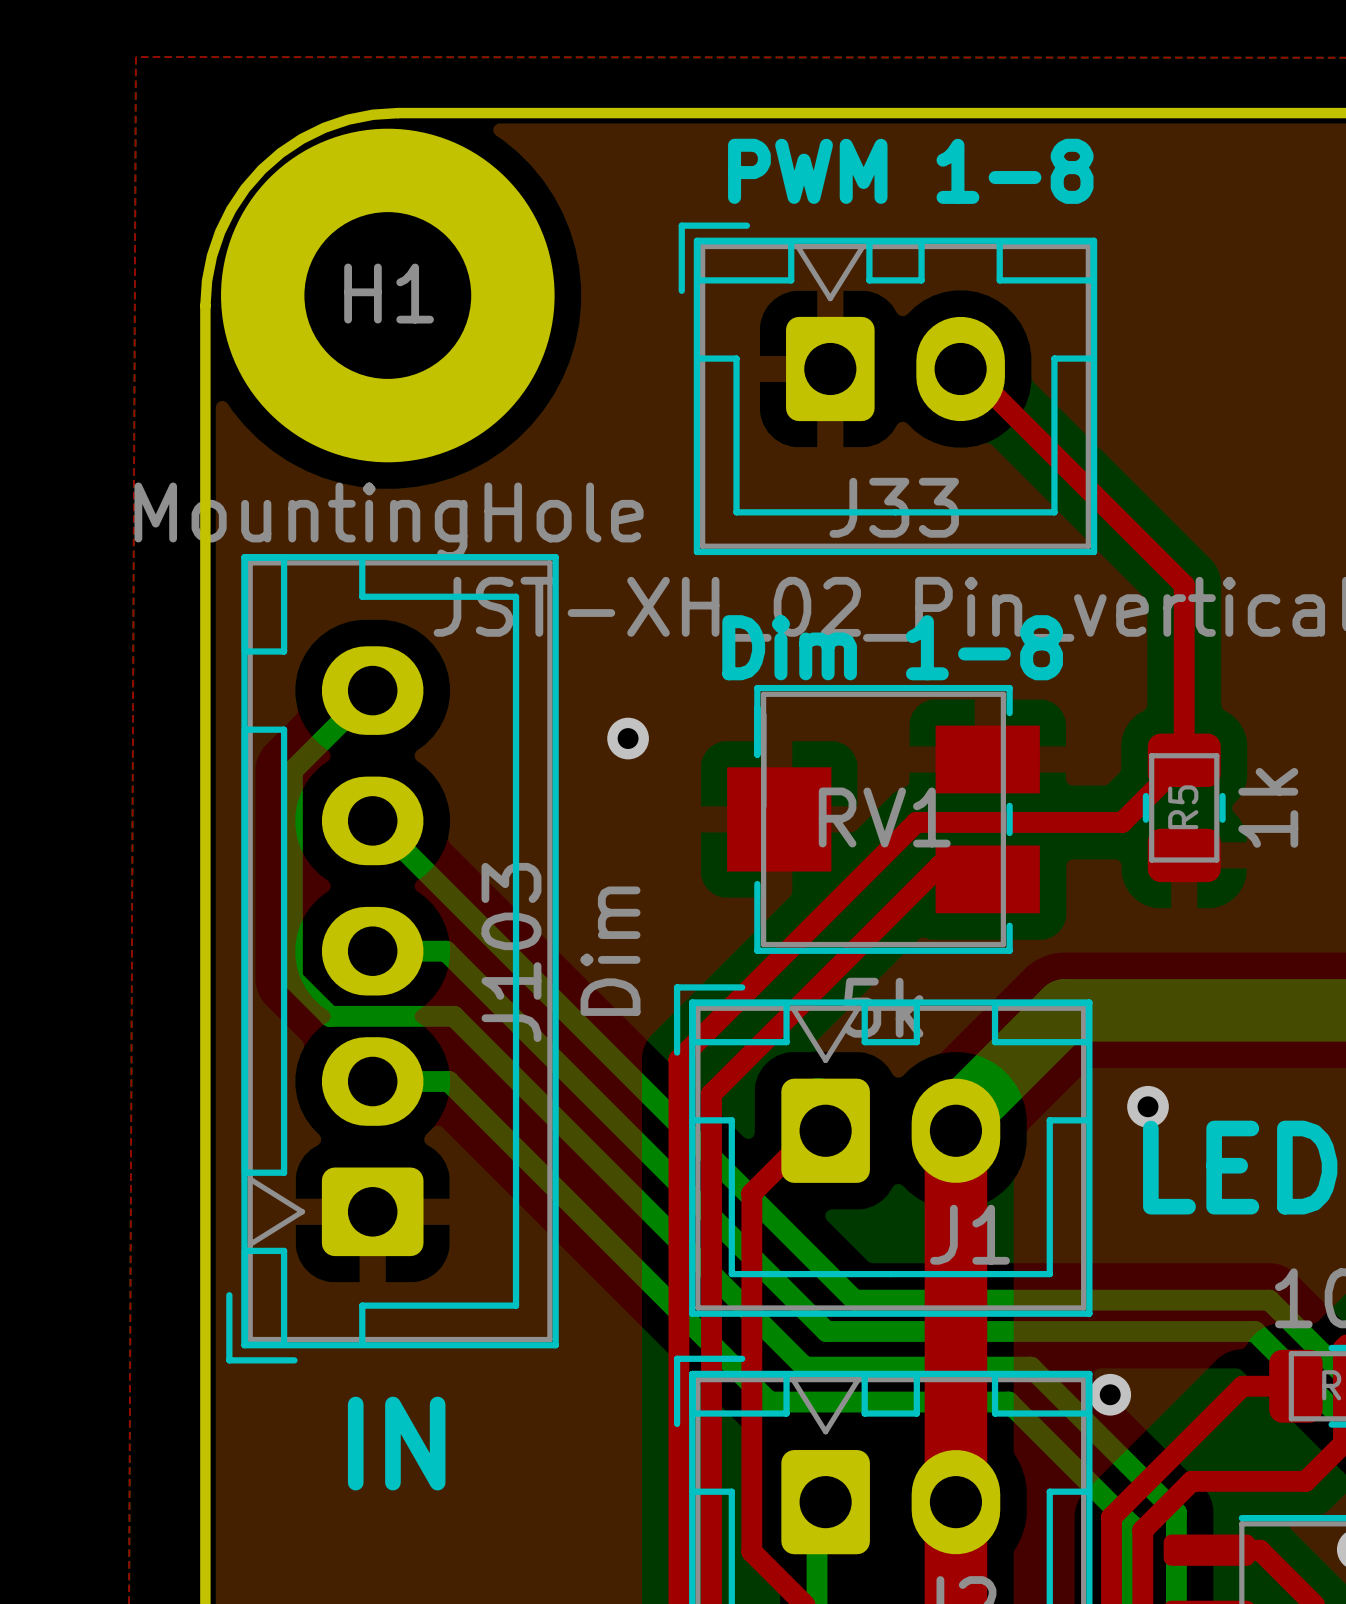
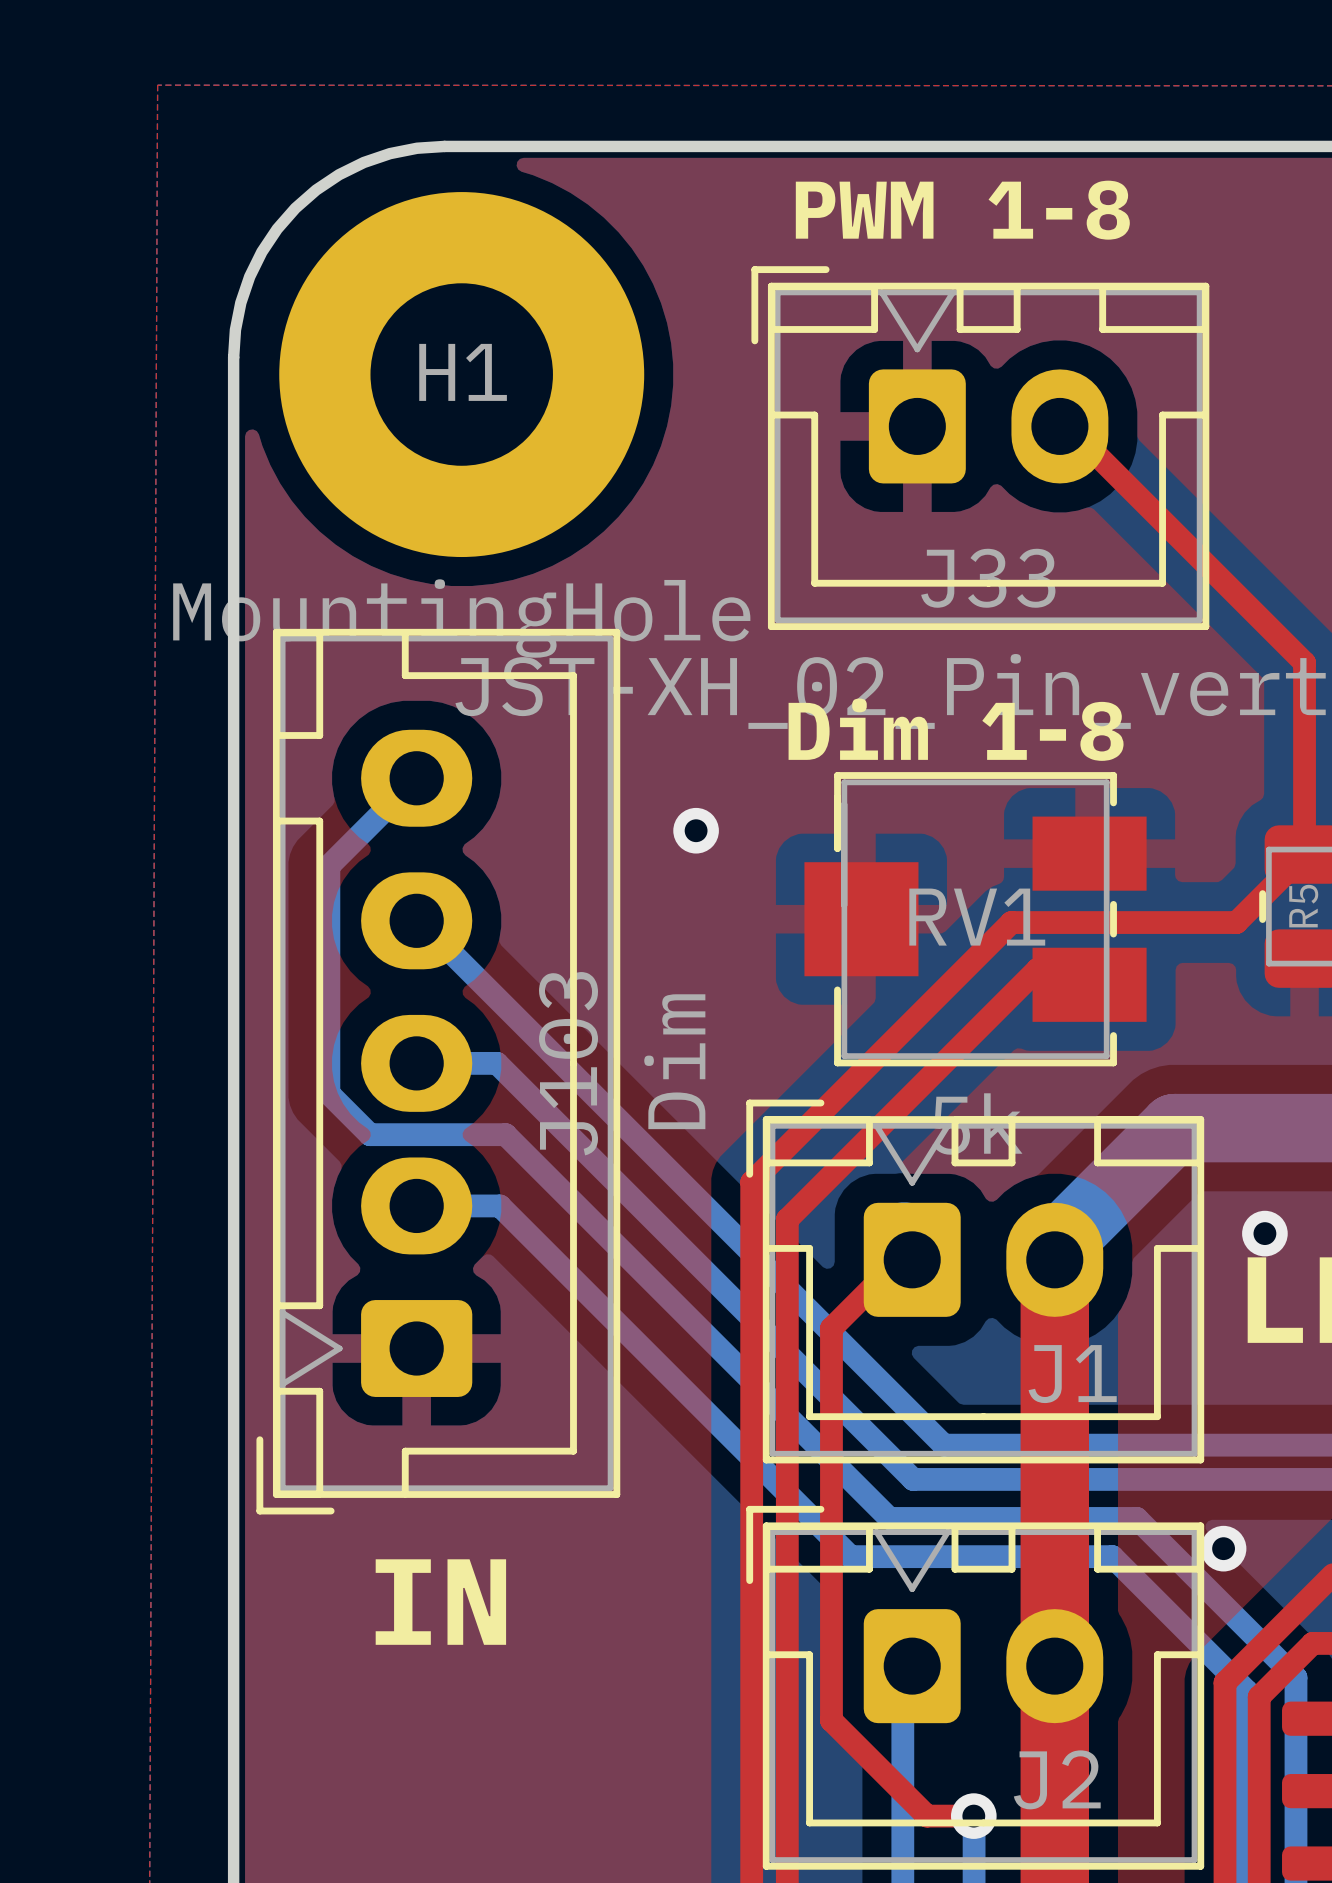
H1 position: (387, 295) -> (461, 374)

